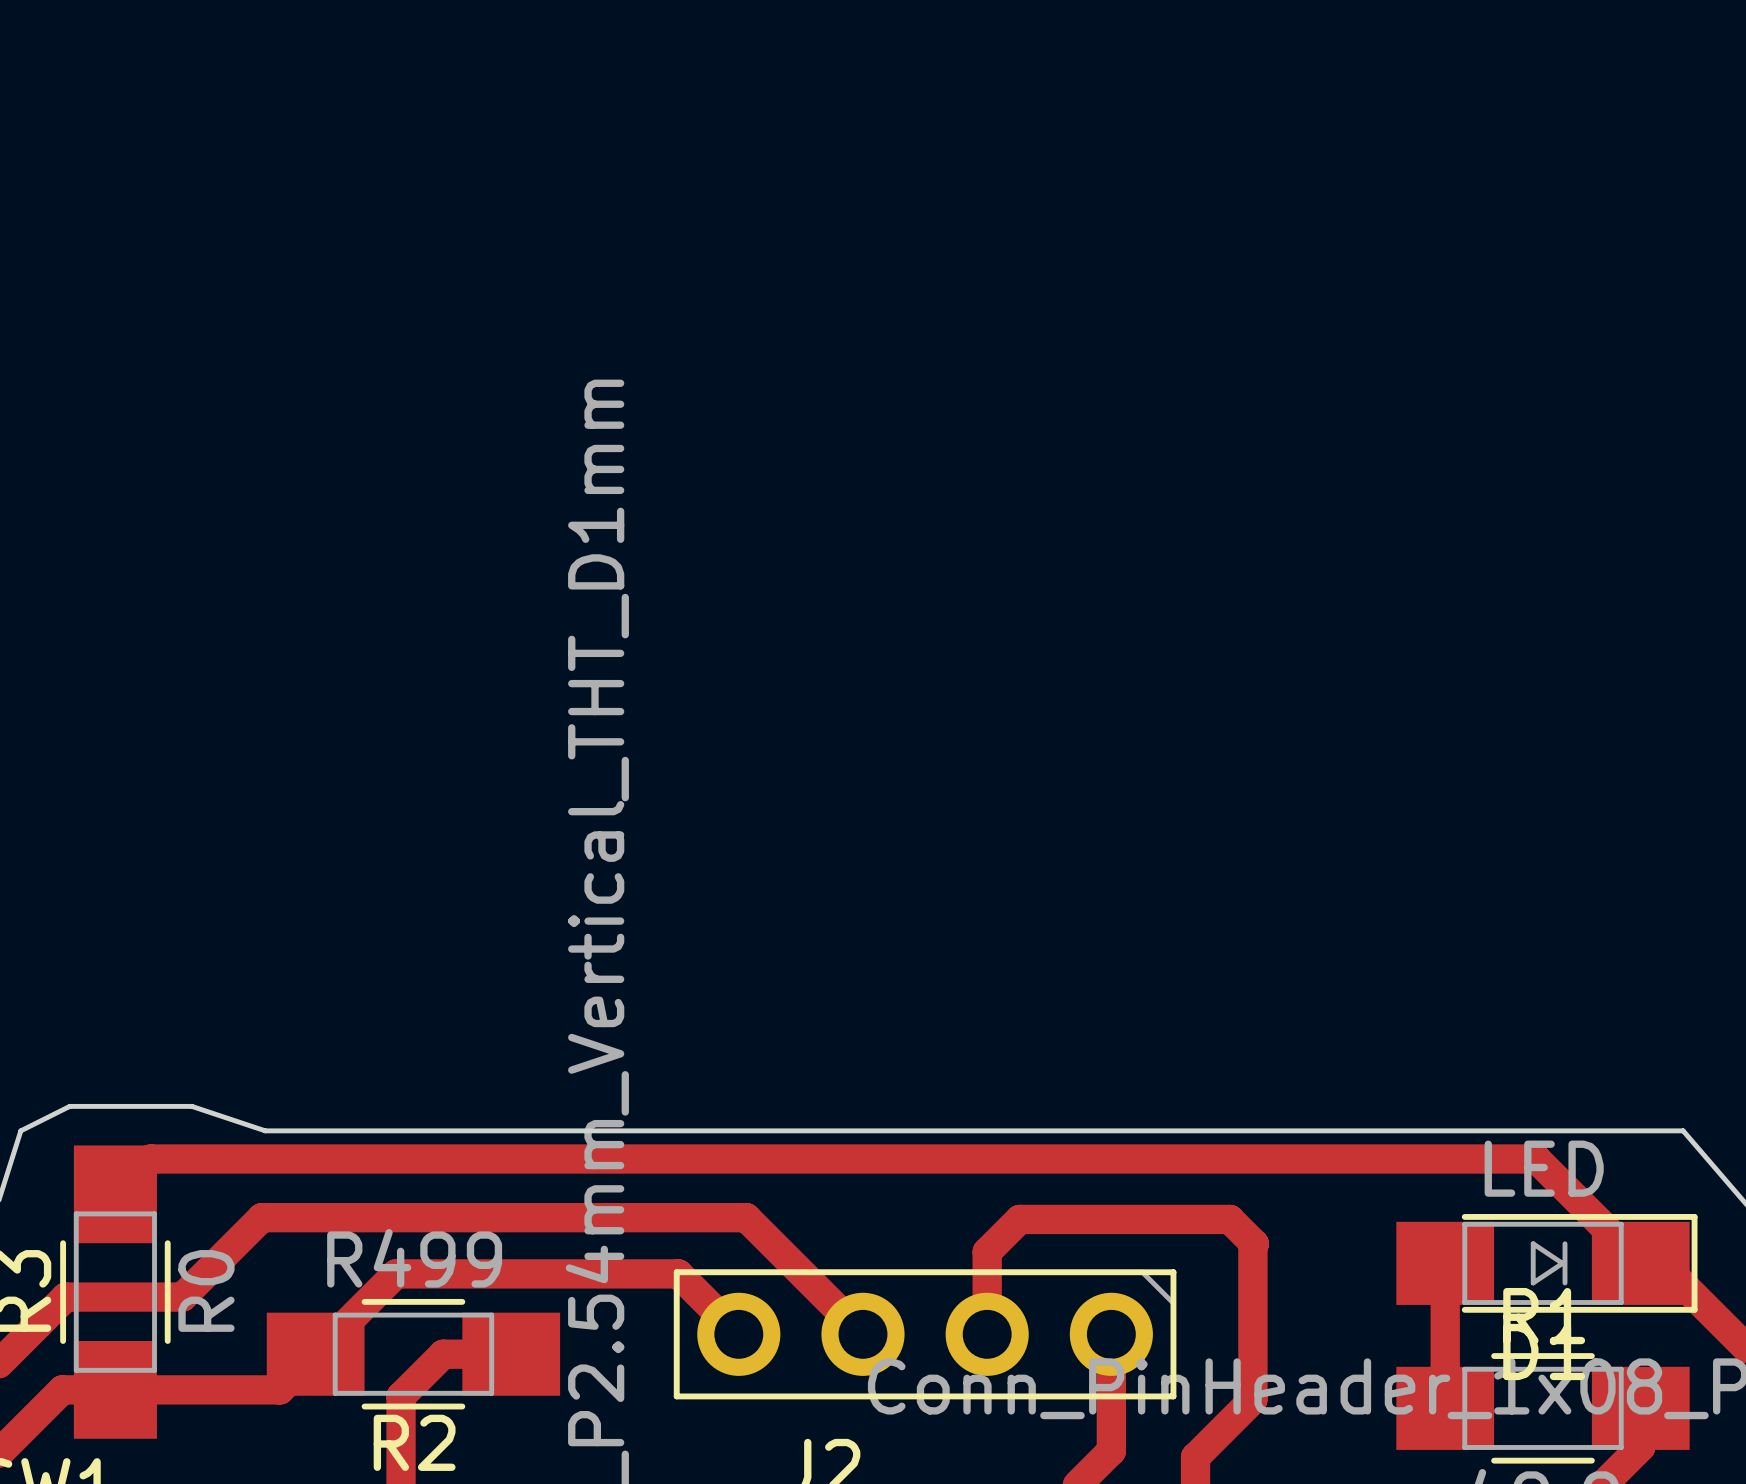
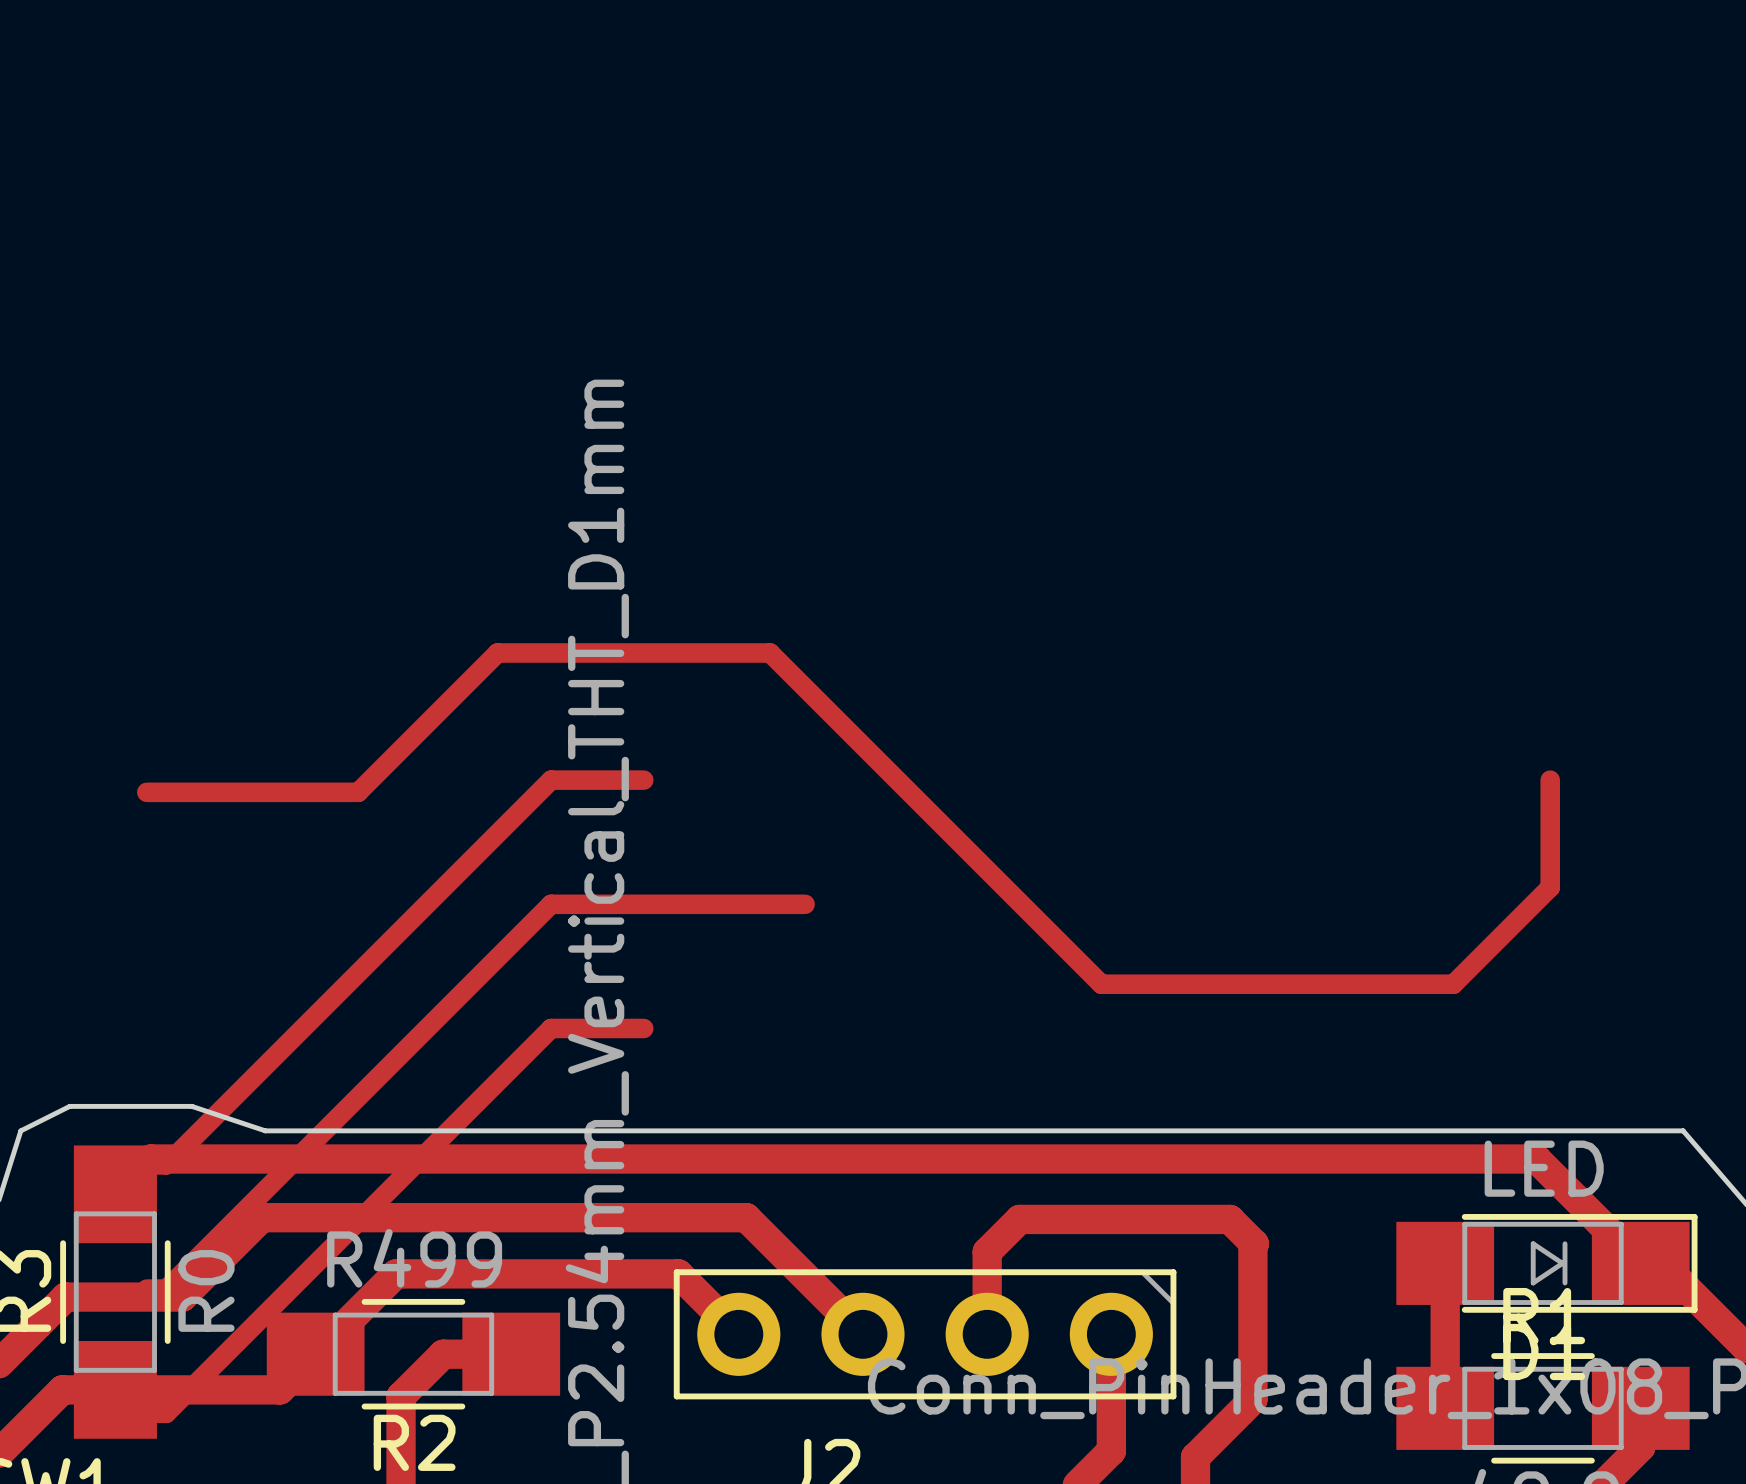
top track: none -> (643, 780) (551, 780) (166, 1164) (146, 1164)
top track: none -> (1550, 780) (1550, 887) (1453, 984) (1101, 984) (770, 652) (497, 652) (358, 792) (146, 792)
top track: none -> (805, 904) (551, 904) (166, 1289) (146, 1289)
top track: none -> (643, 1028) (551, 1028) (166, 1413) (146, 1413)

